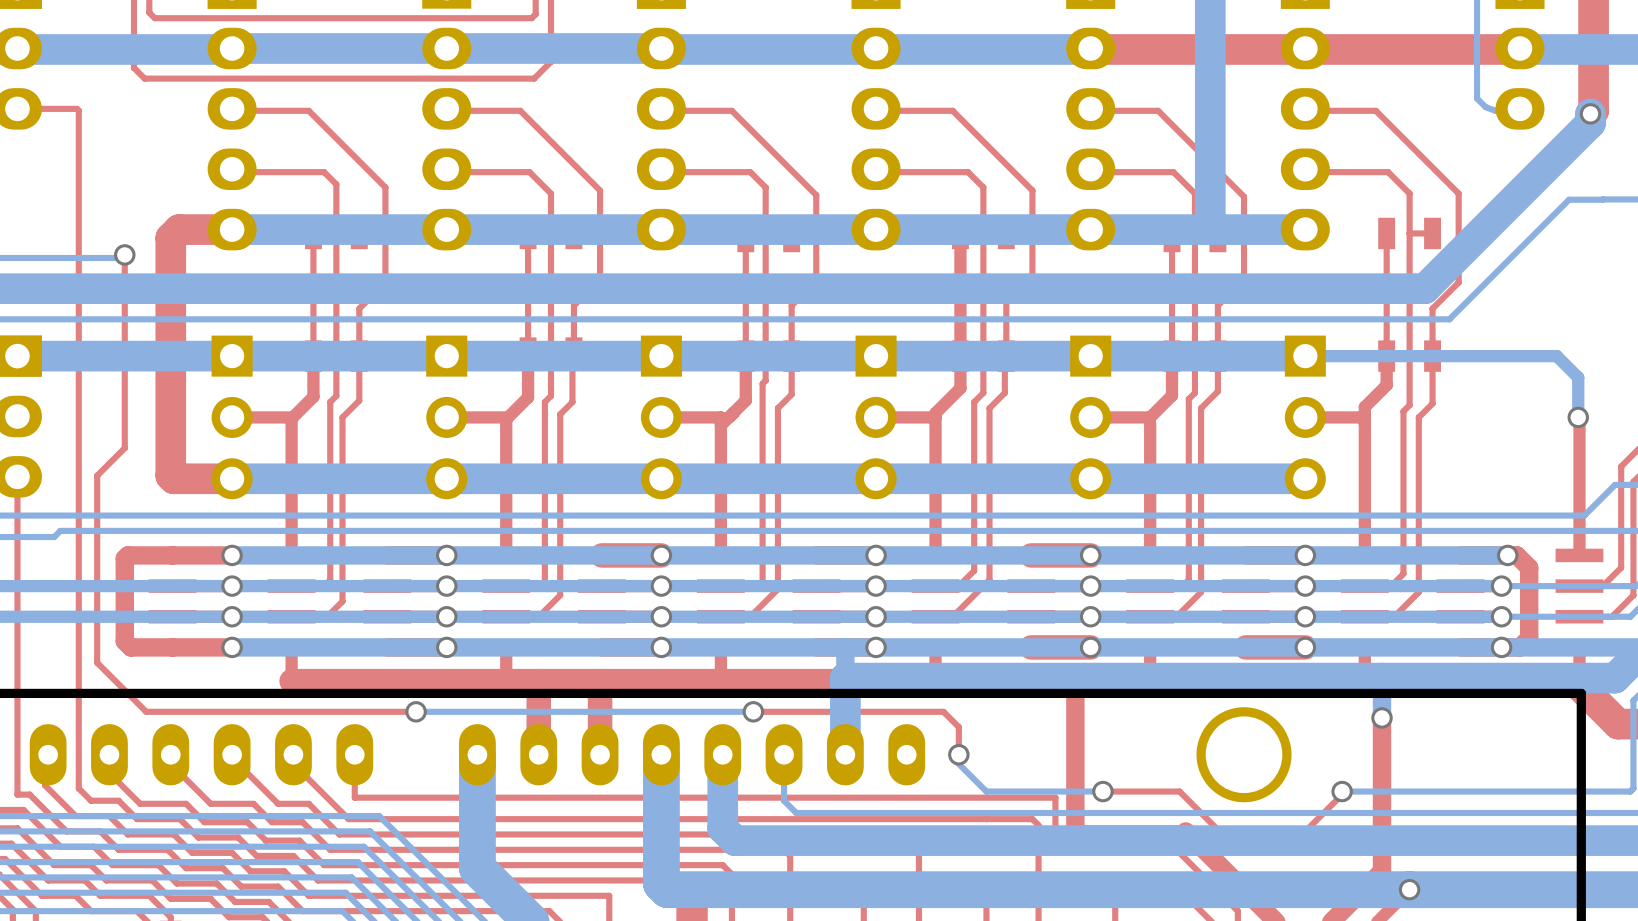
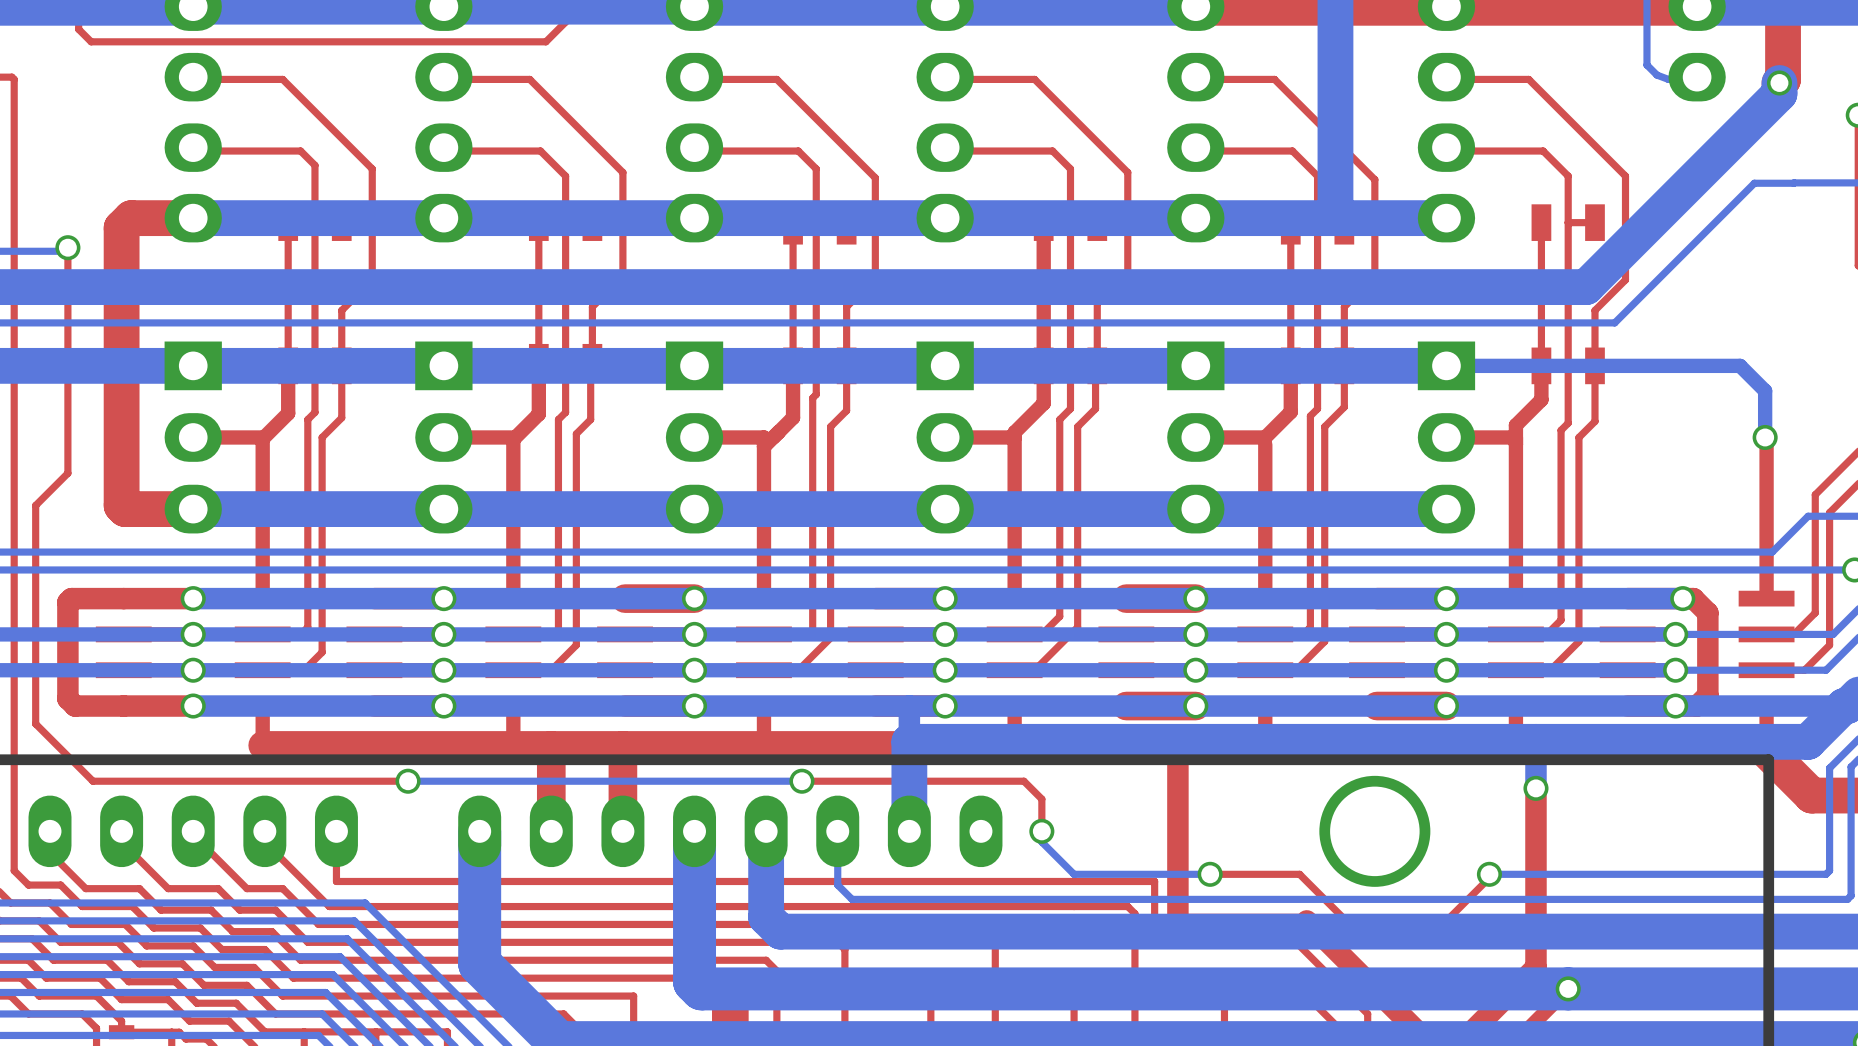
part footprint: [211, 335, 253, 500] -> [164, 341, 222, 534]
part footprint: [426, 335, 468, 500] -> [415, 341, 473, 534]
part footprint: [640, 335, 682, 500] -> [665, 341, 724, 534]
part footprint: [855, 335, 897, 500] -> [916, 341, 974, 534]
part footprint: [1070, 335, 1112, 500] -> [1167, 341, 1225, 534]
part footprint: [1284, 335, 1326, 500] -> [1417, 341, 1476, 534]

